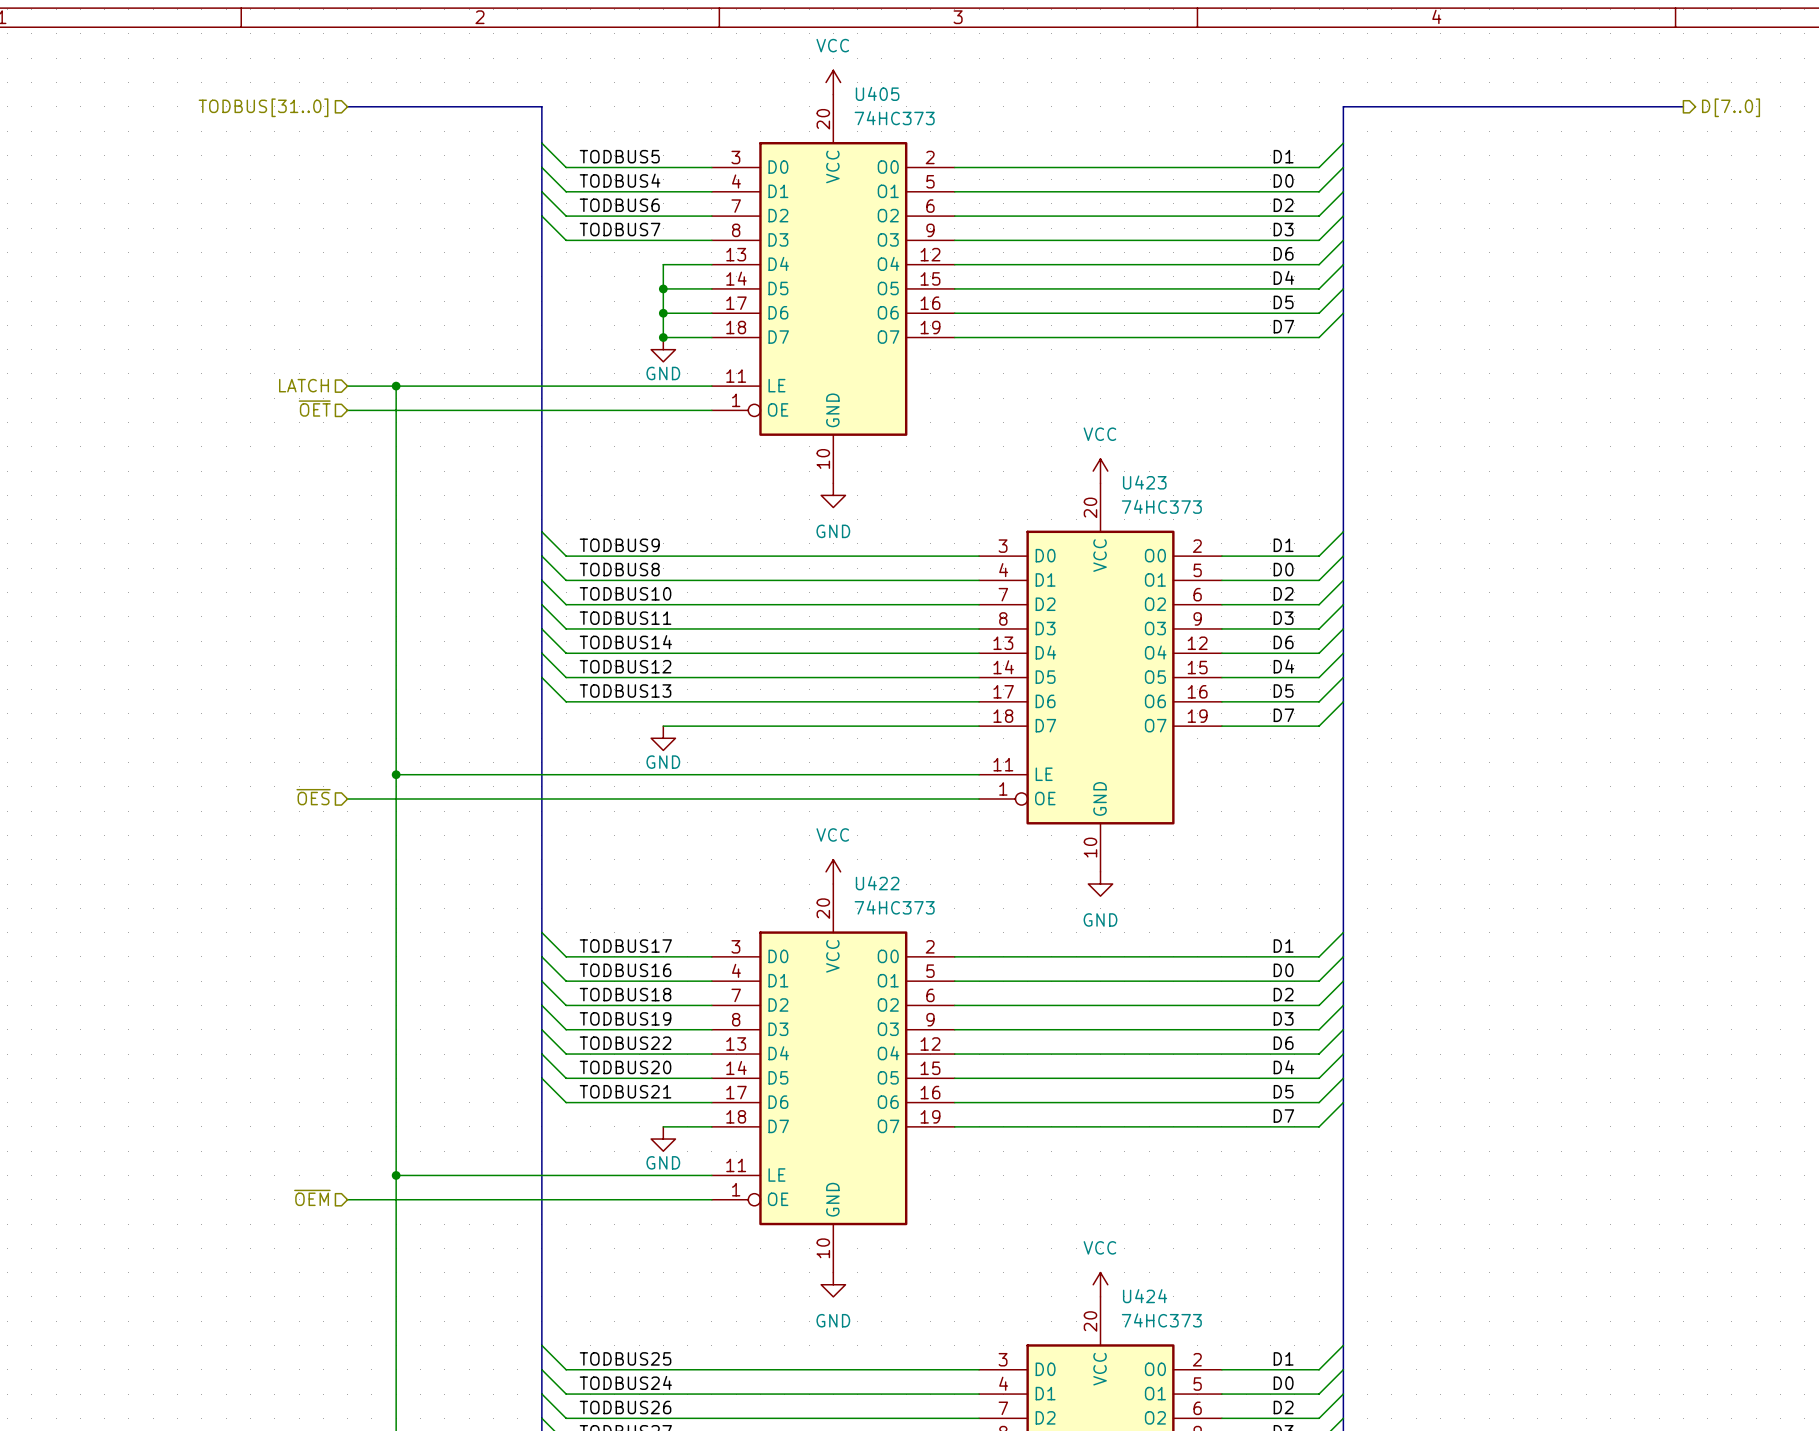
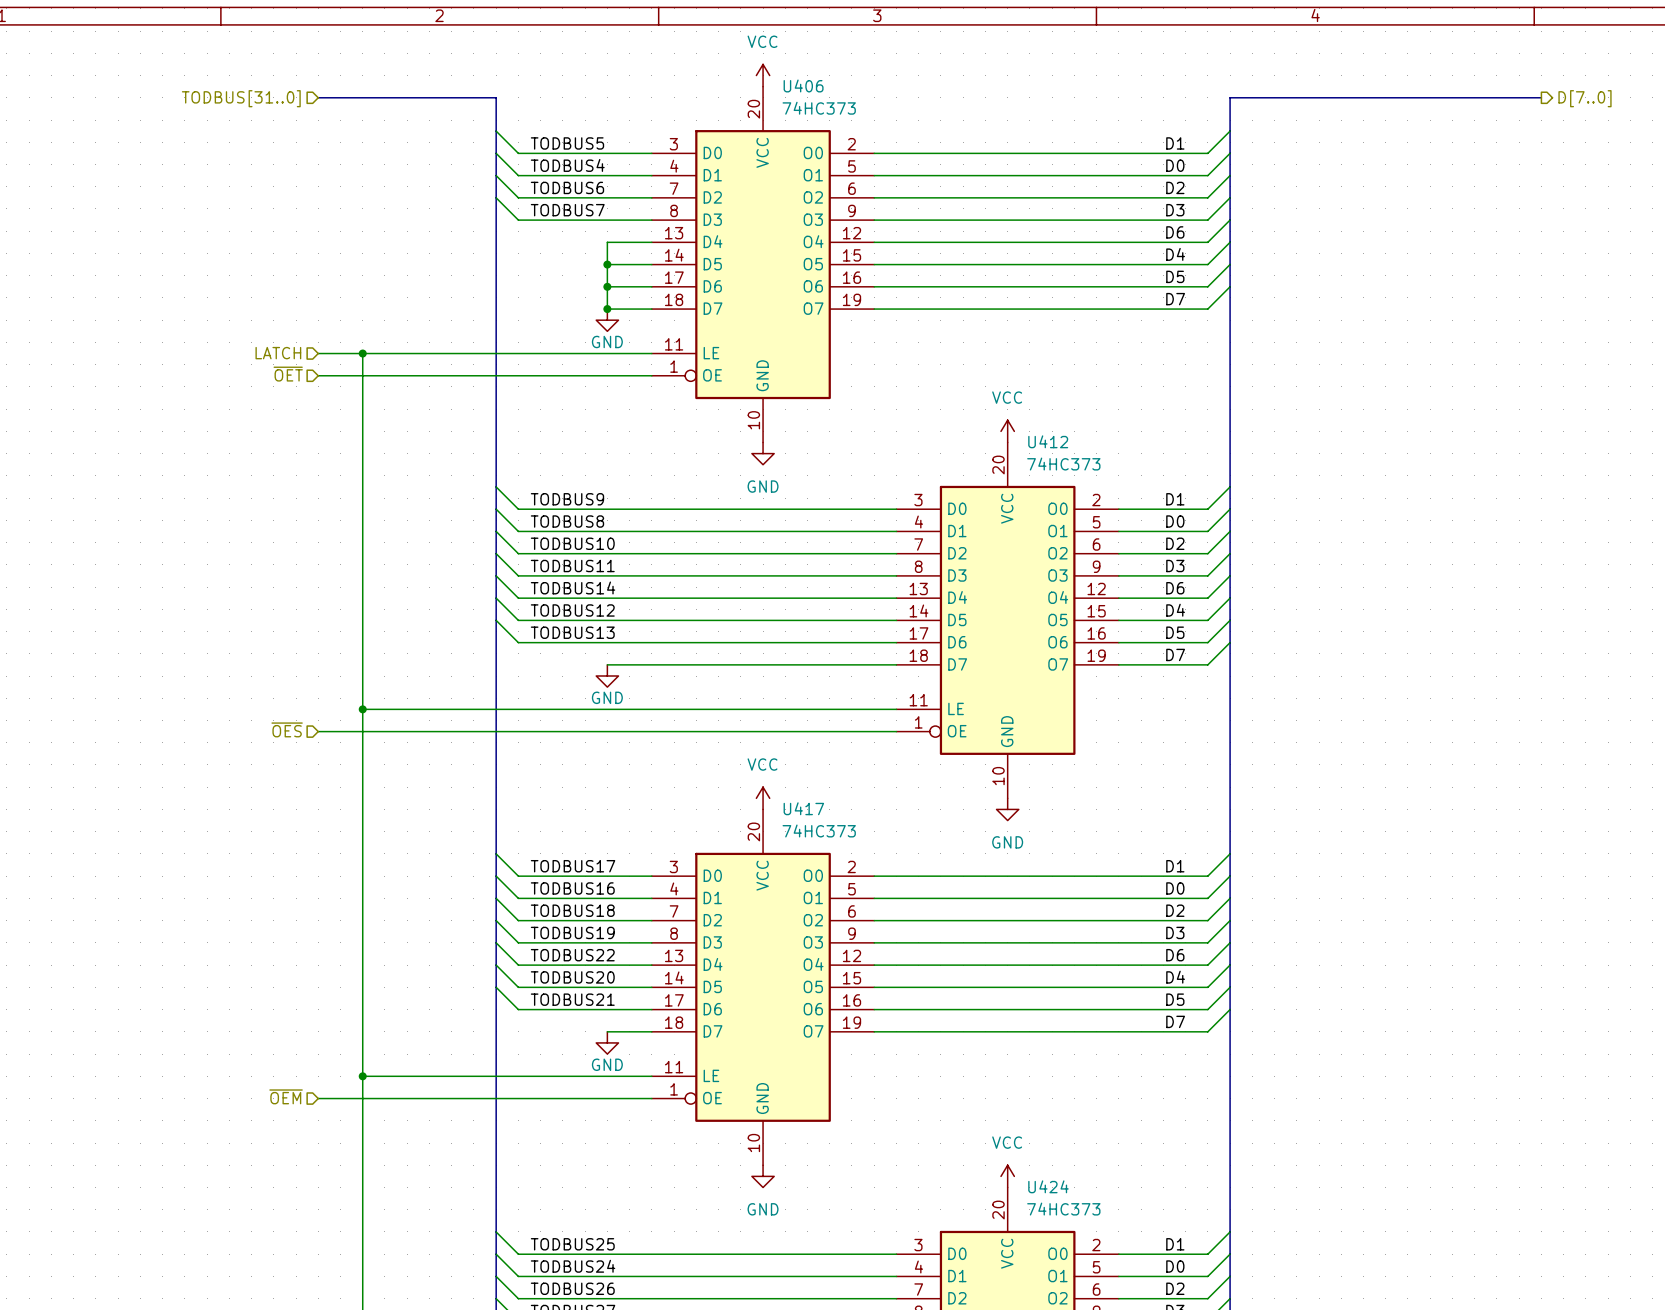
U405 name: U405 (877, 93) -> U406 (803, 85)
U423 name: U423 (1144, 482) -> U412 (1048, 441)
U422 name: U422 (877, 883) -> U417 (803, 808)

